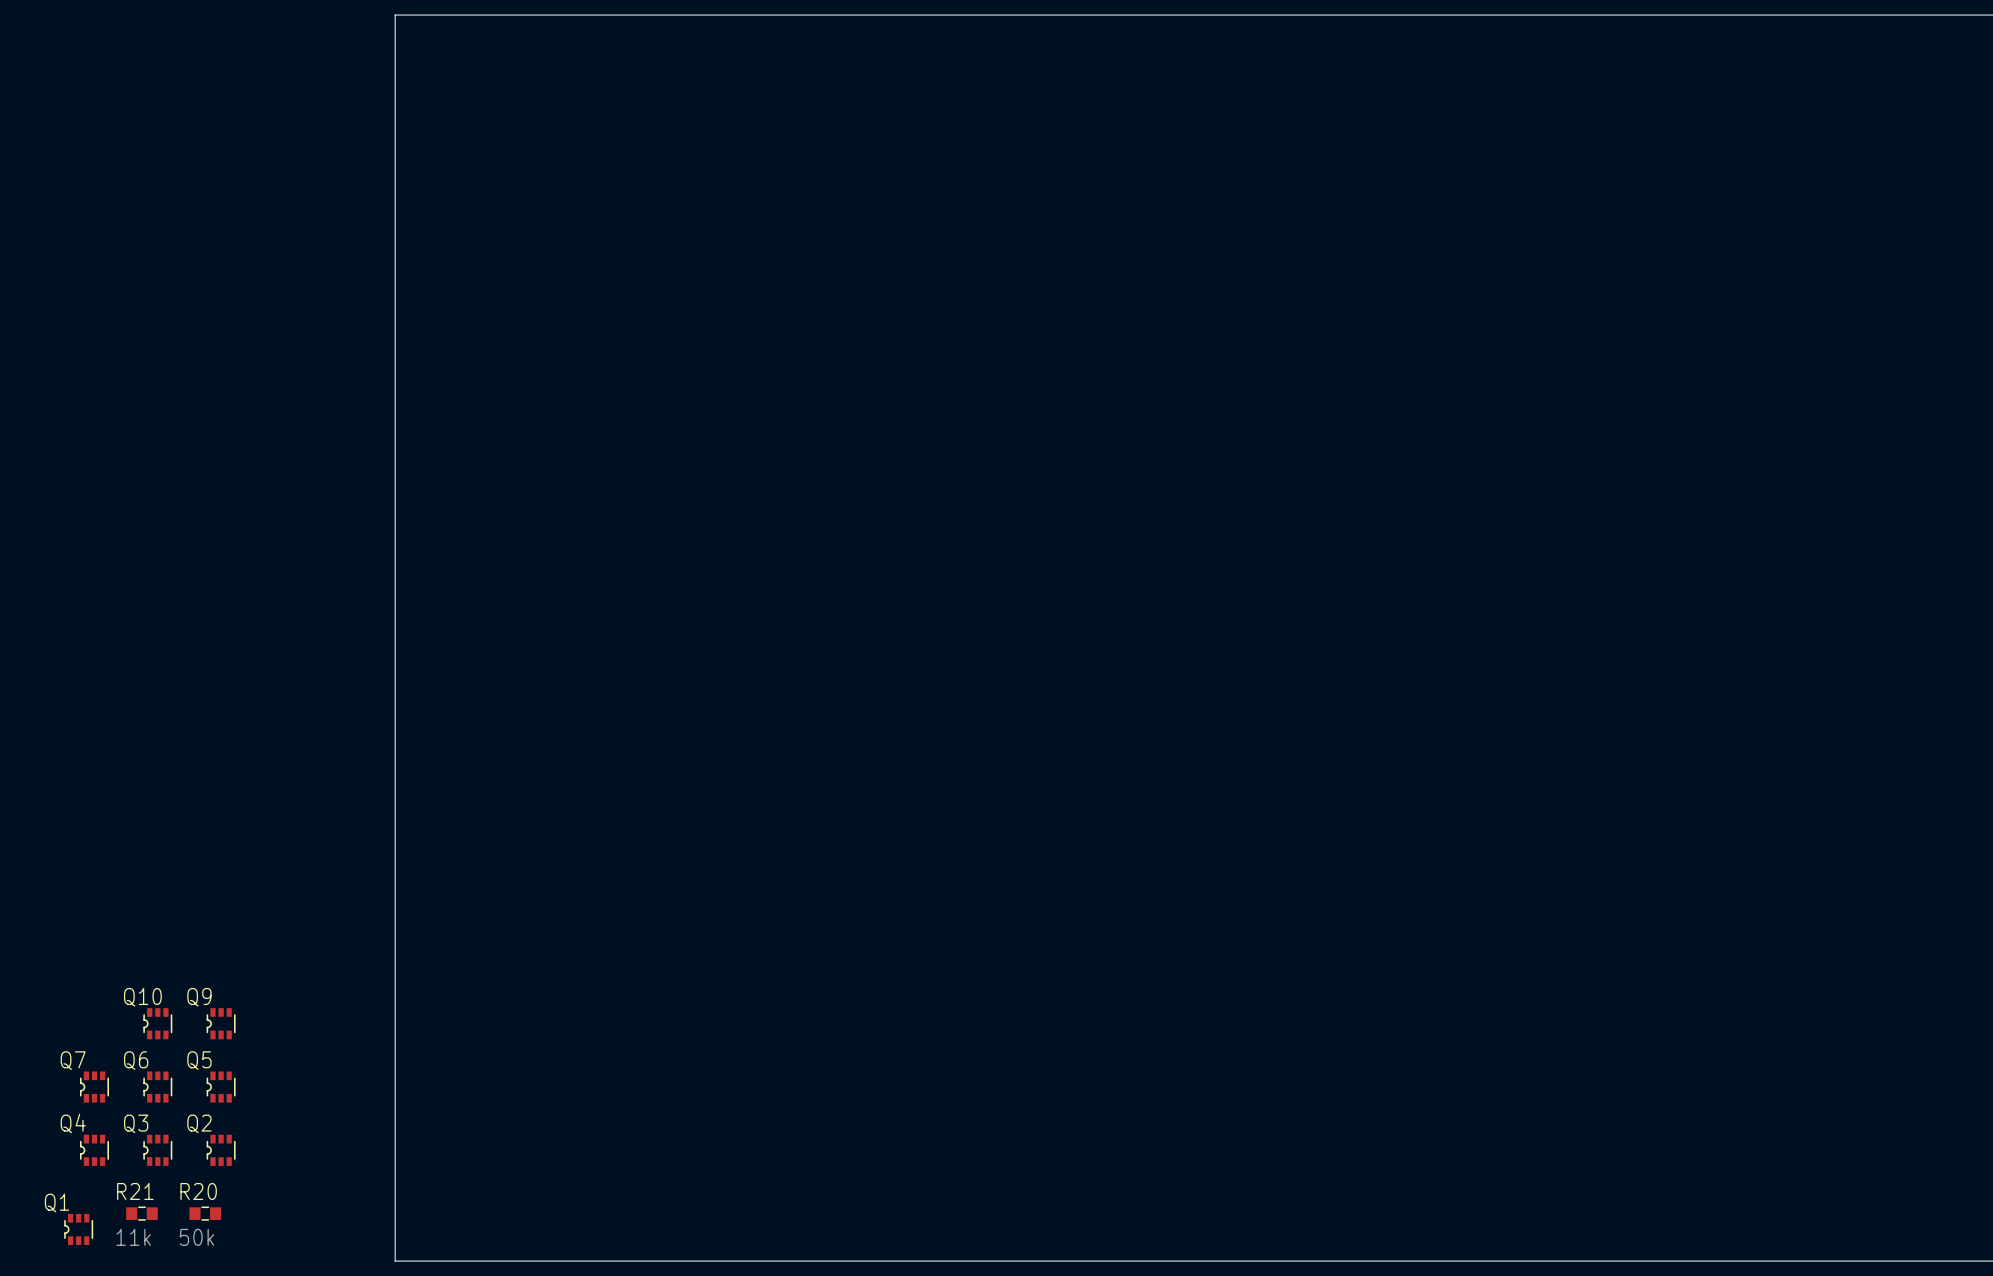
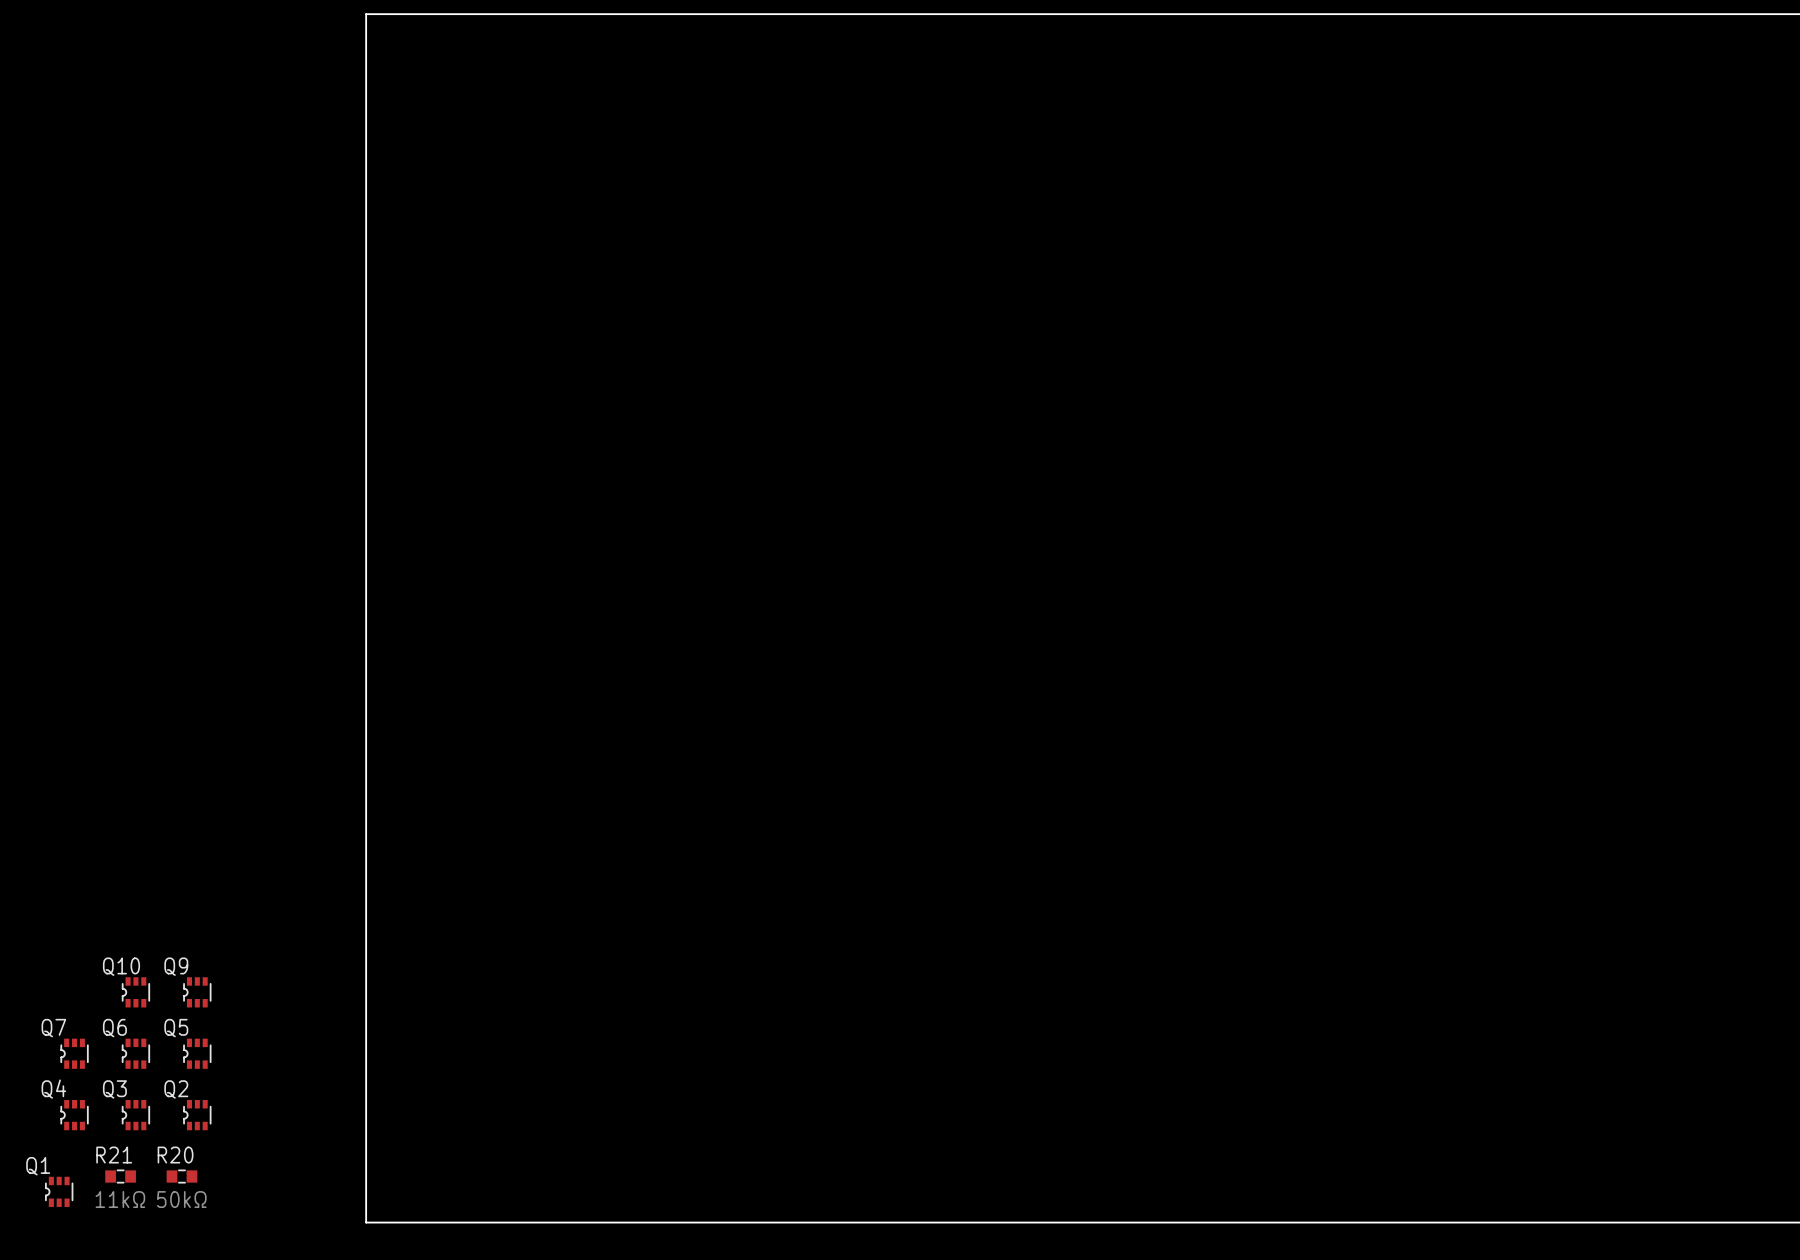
R21 value: 11k (133, 1237) -> 11kΩ (120, 1199)
R20 value: 50k (196, 1237) -> 50kΩ (181, 1199)

